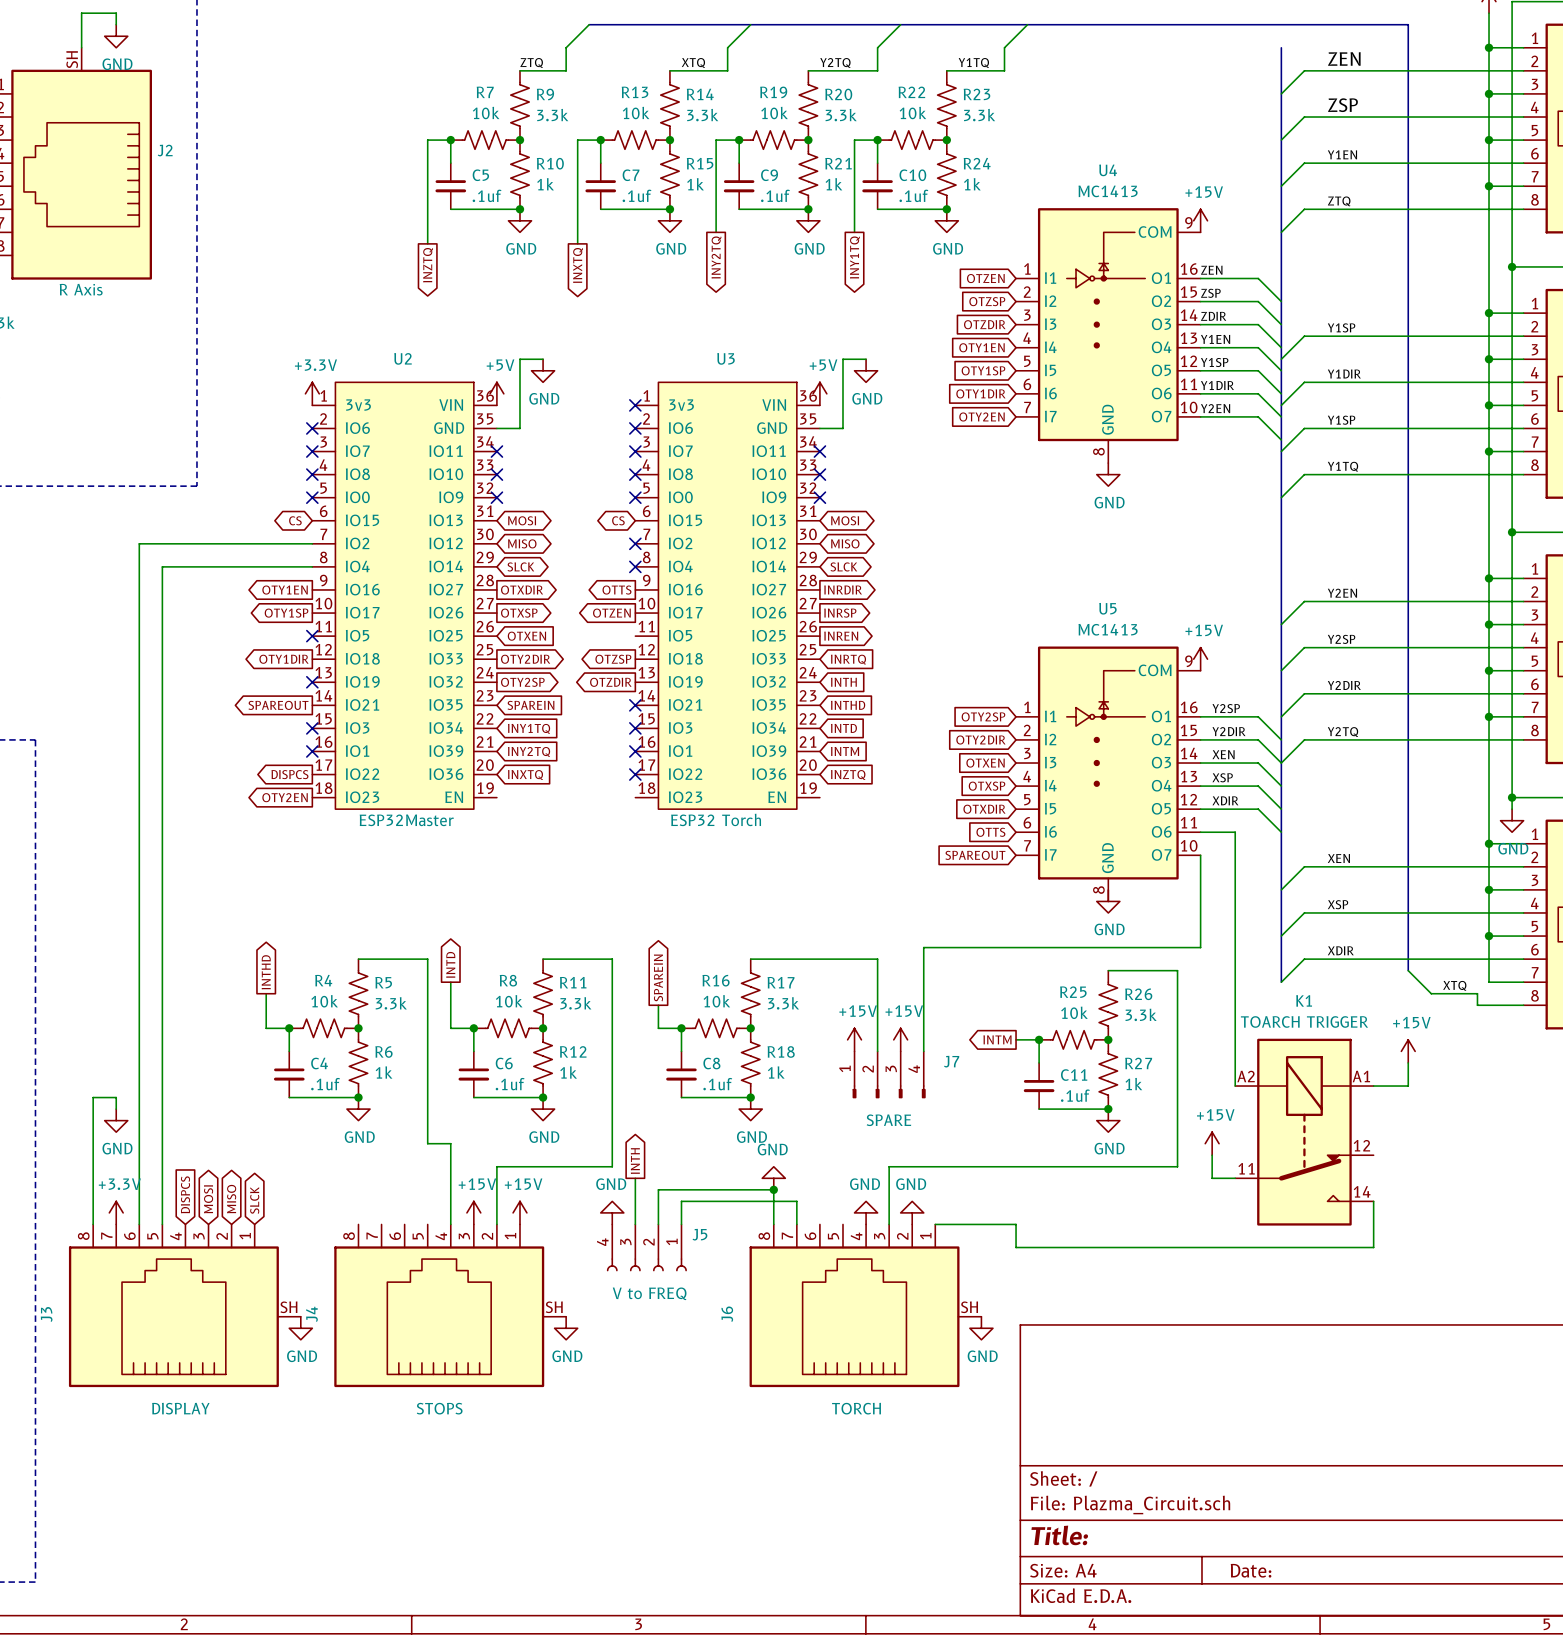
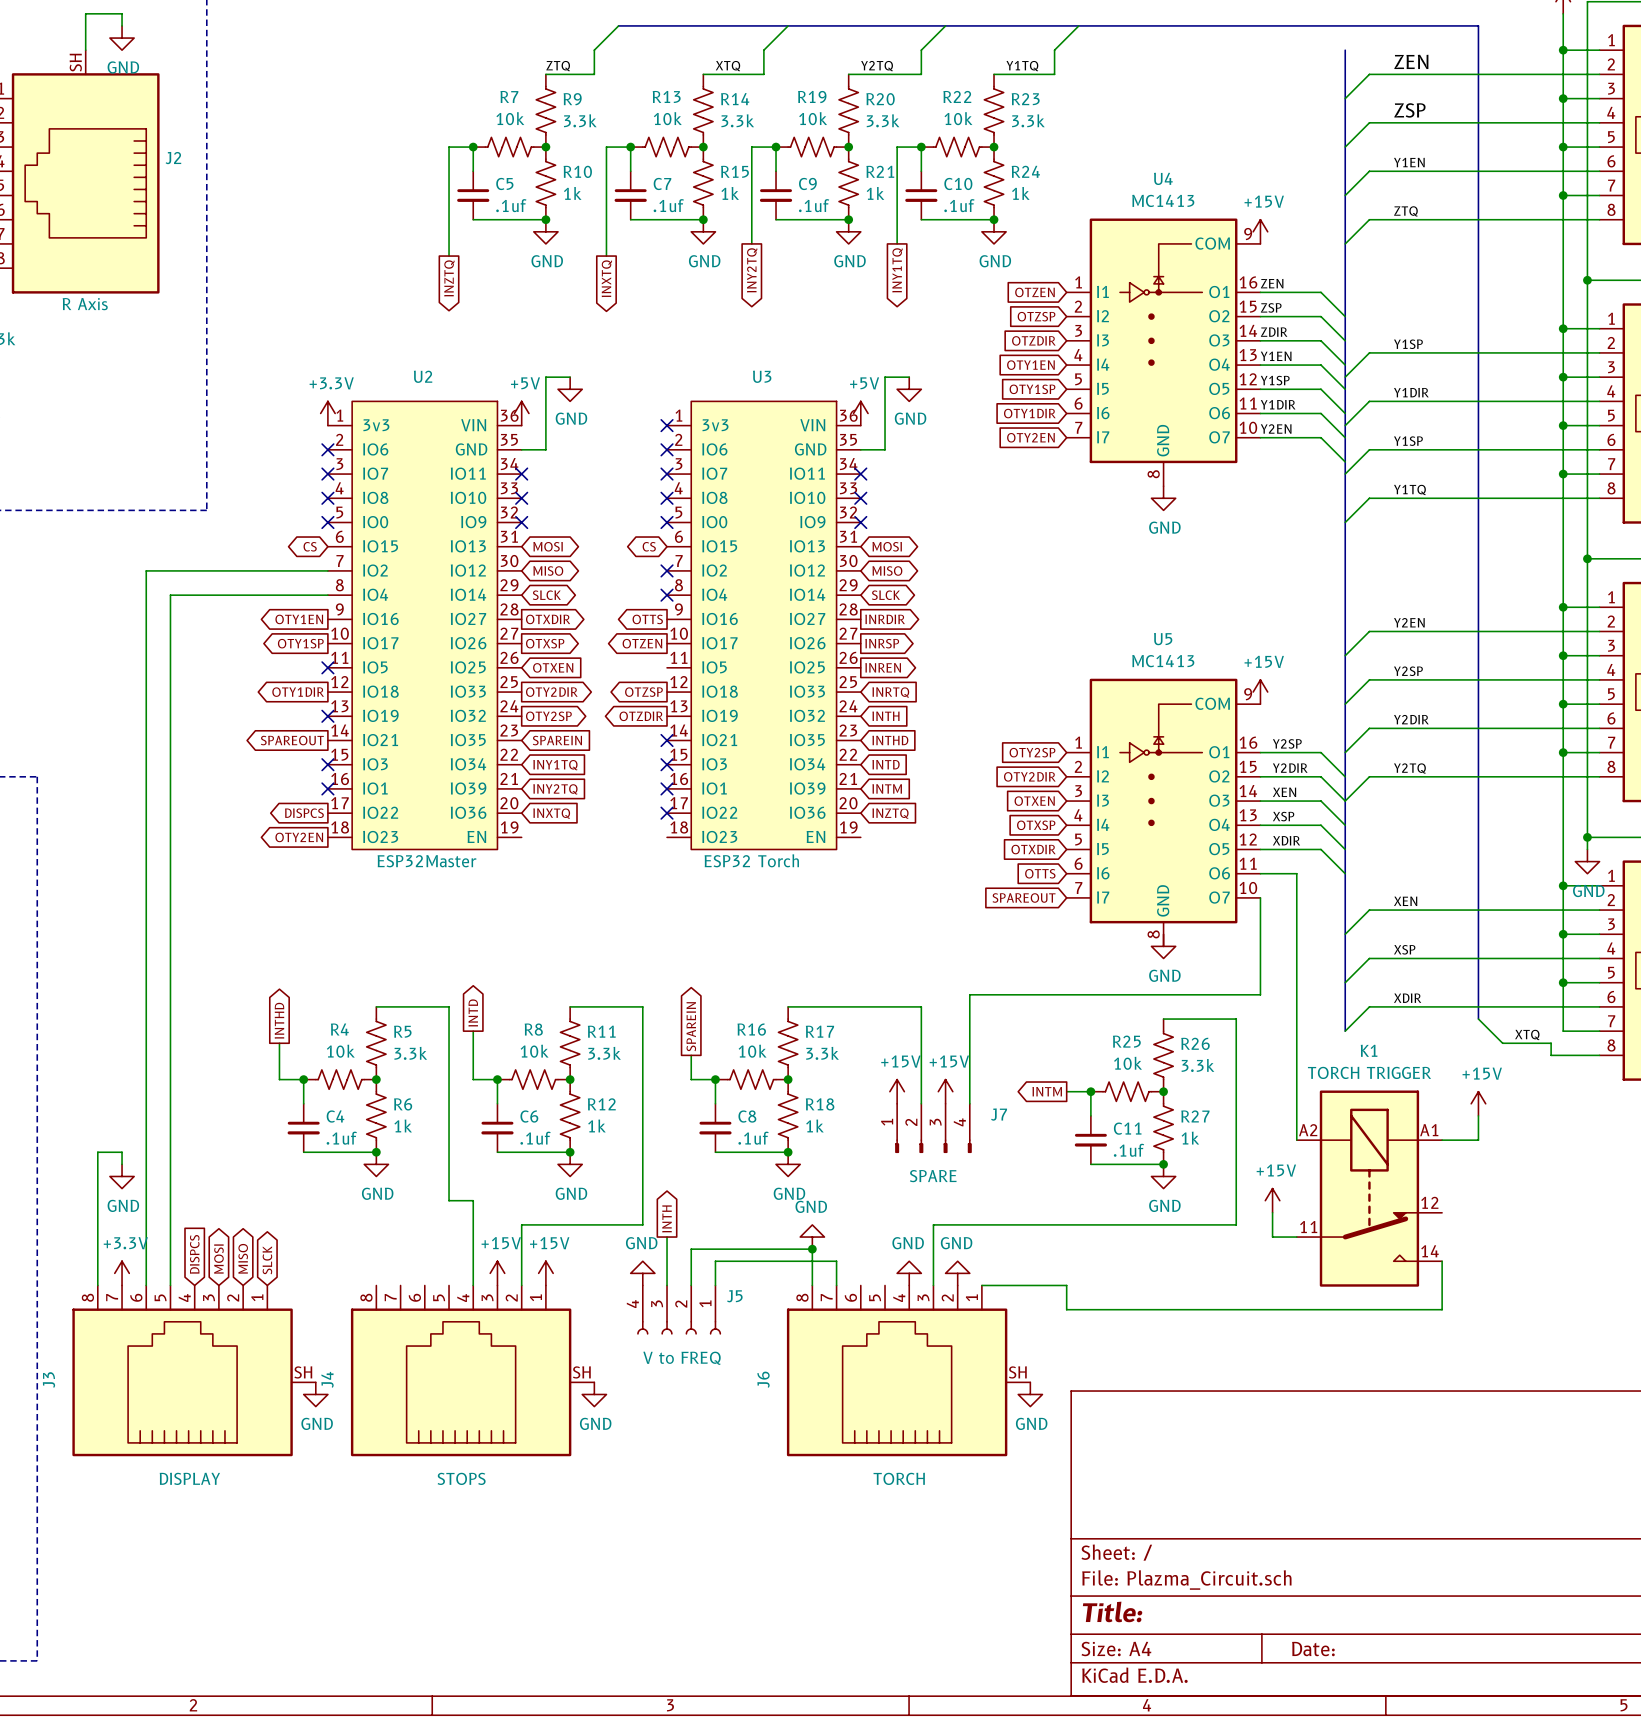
K1 value: TOARCH TRIGGER (1304, 1021) -> TORCH TRIGGER (1369, 1072)

